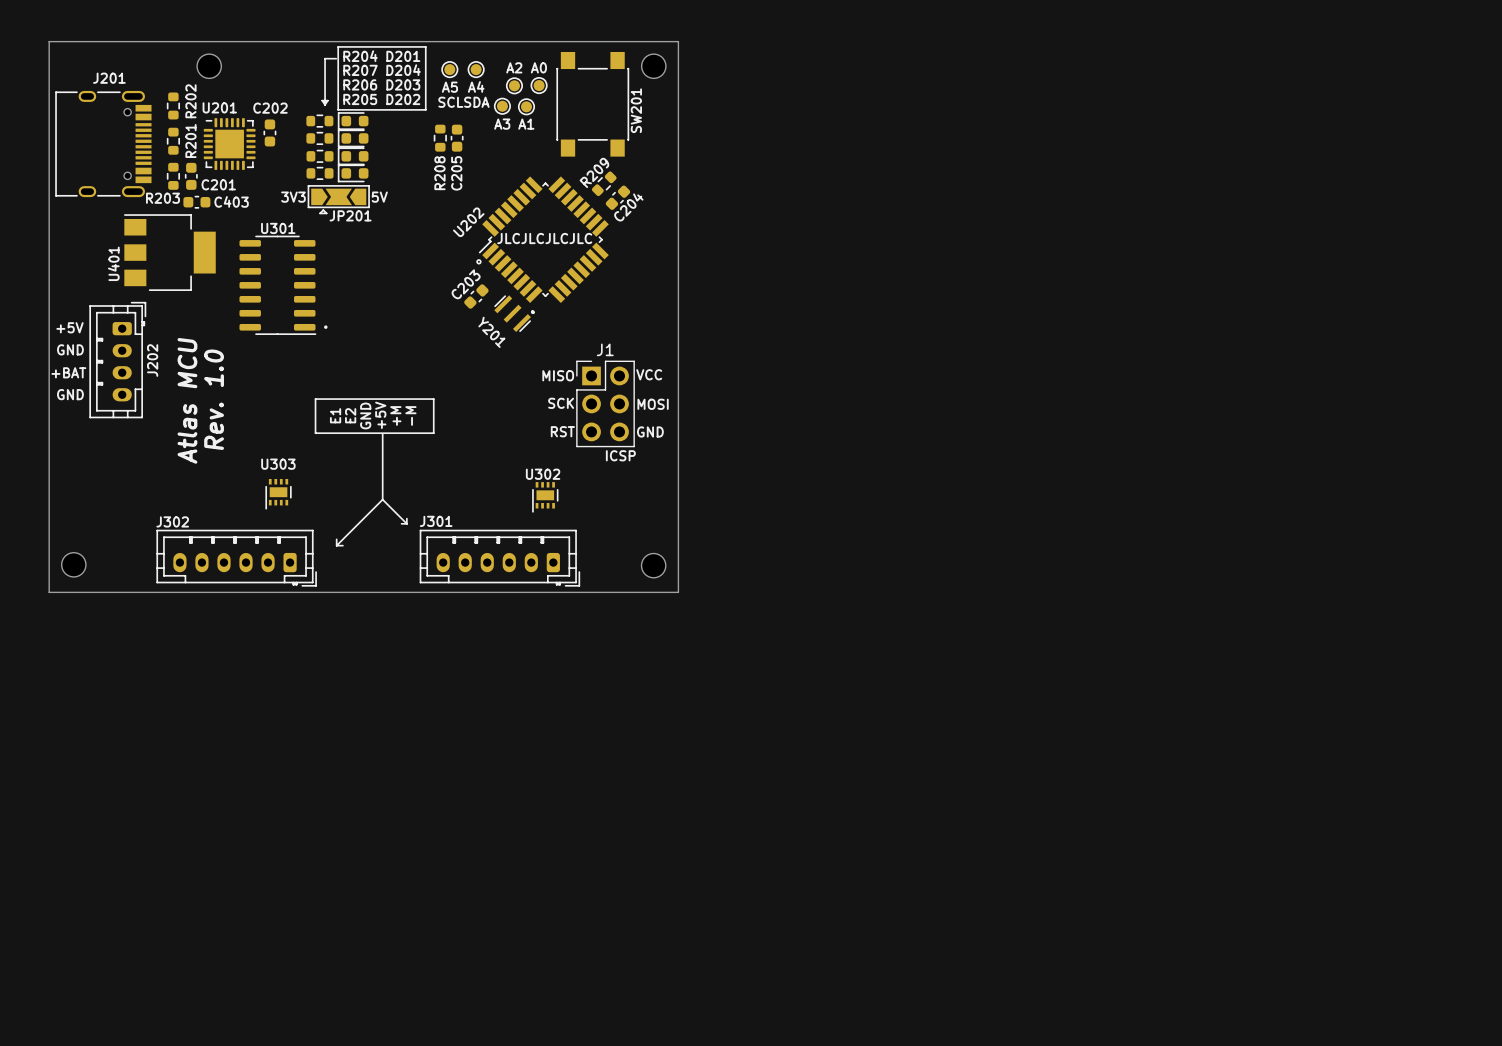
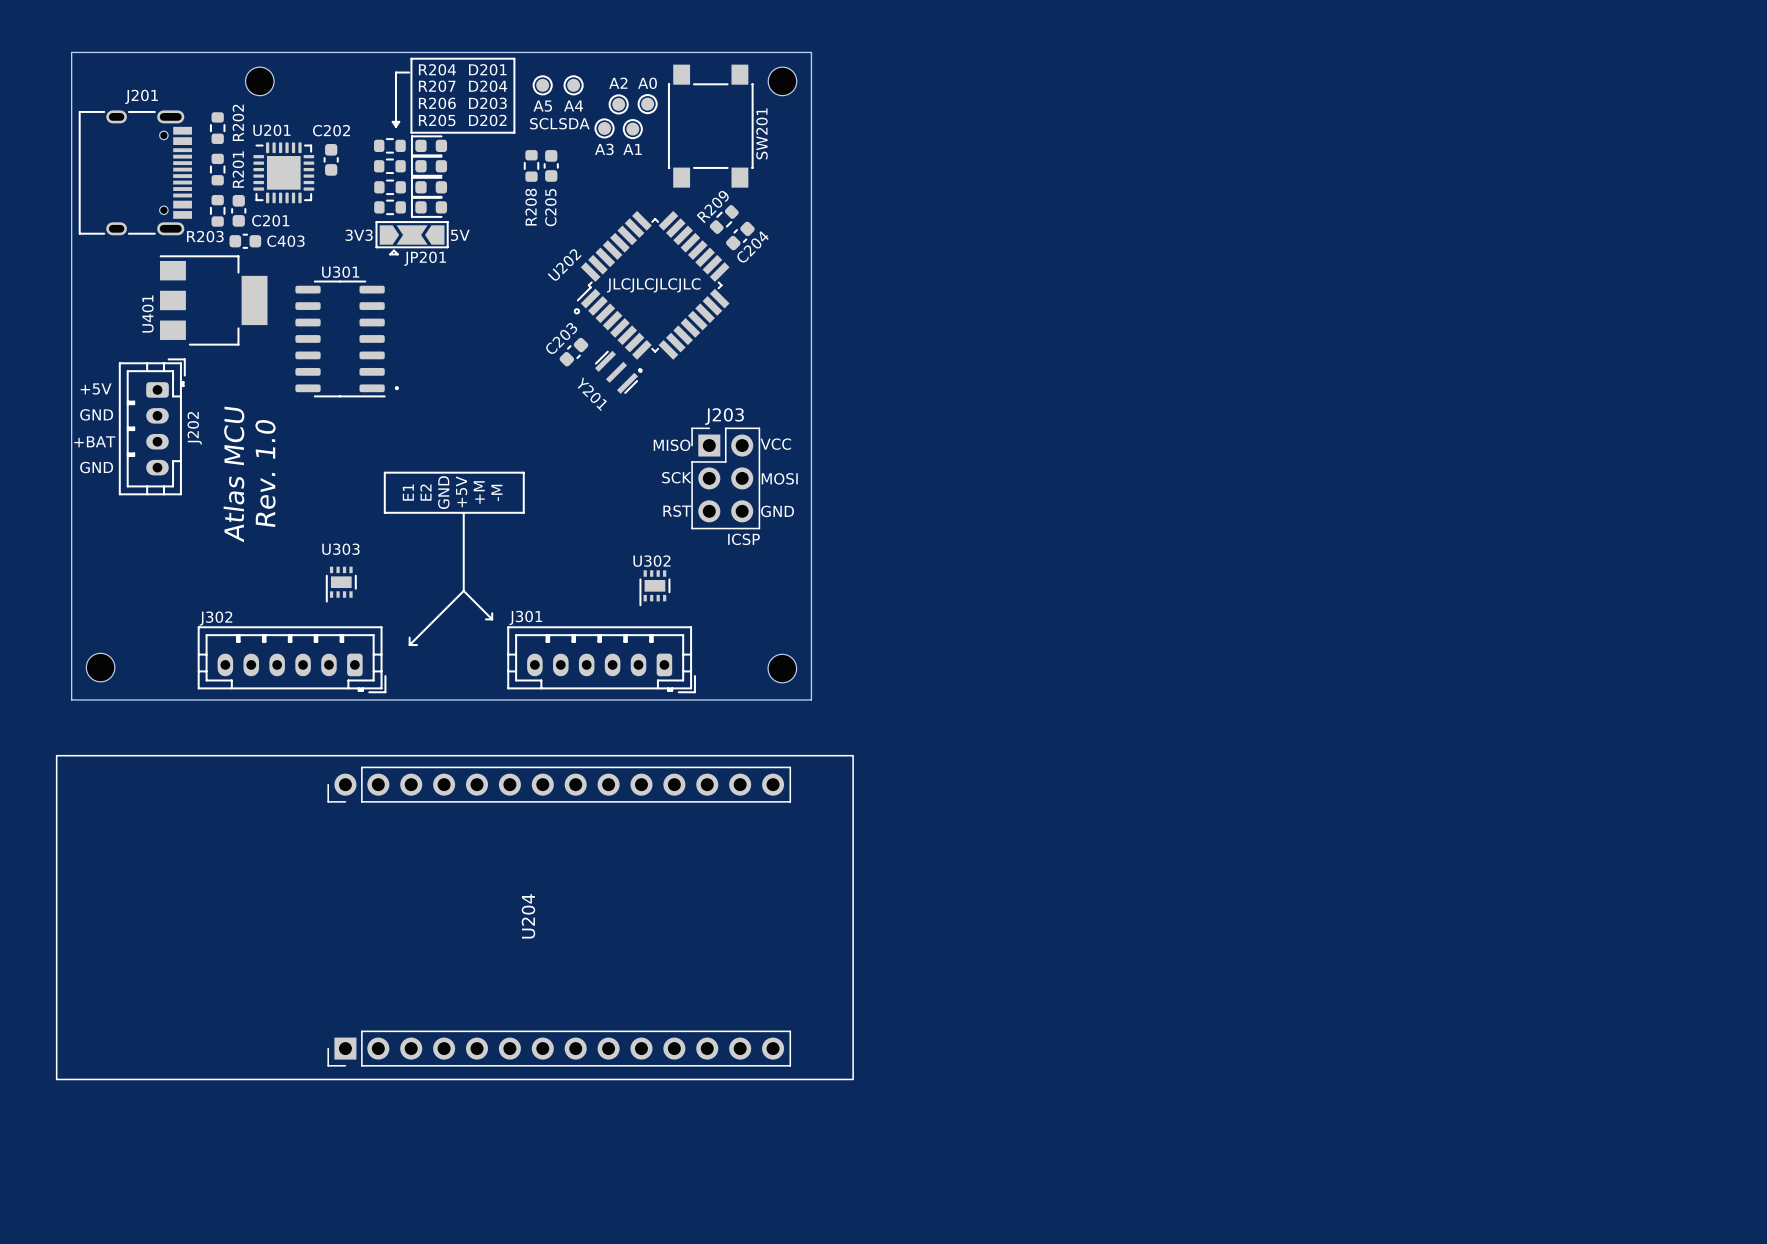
J1 name: J1 (605, 349) -> J203 (724, 416)
U204: none -> (454, 917)

